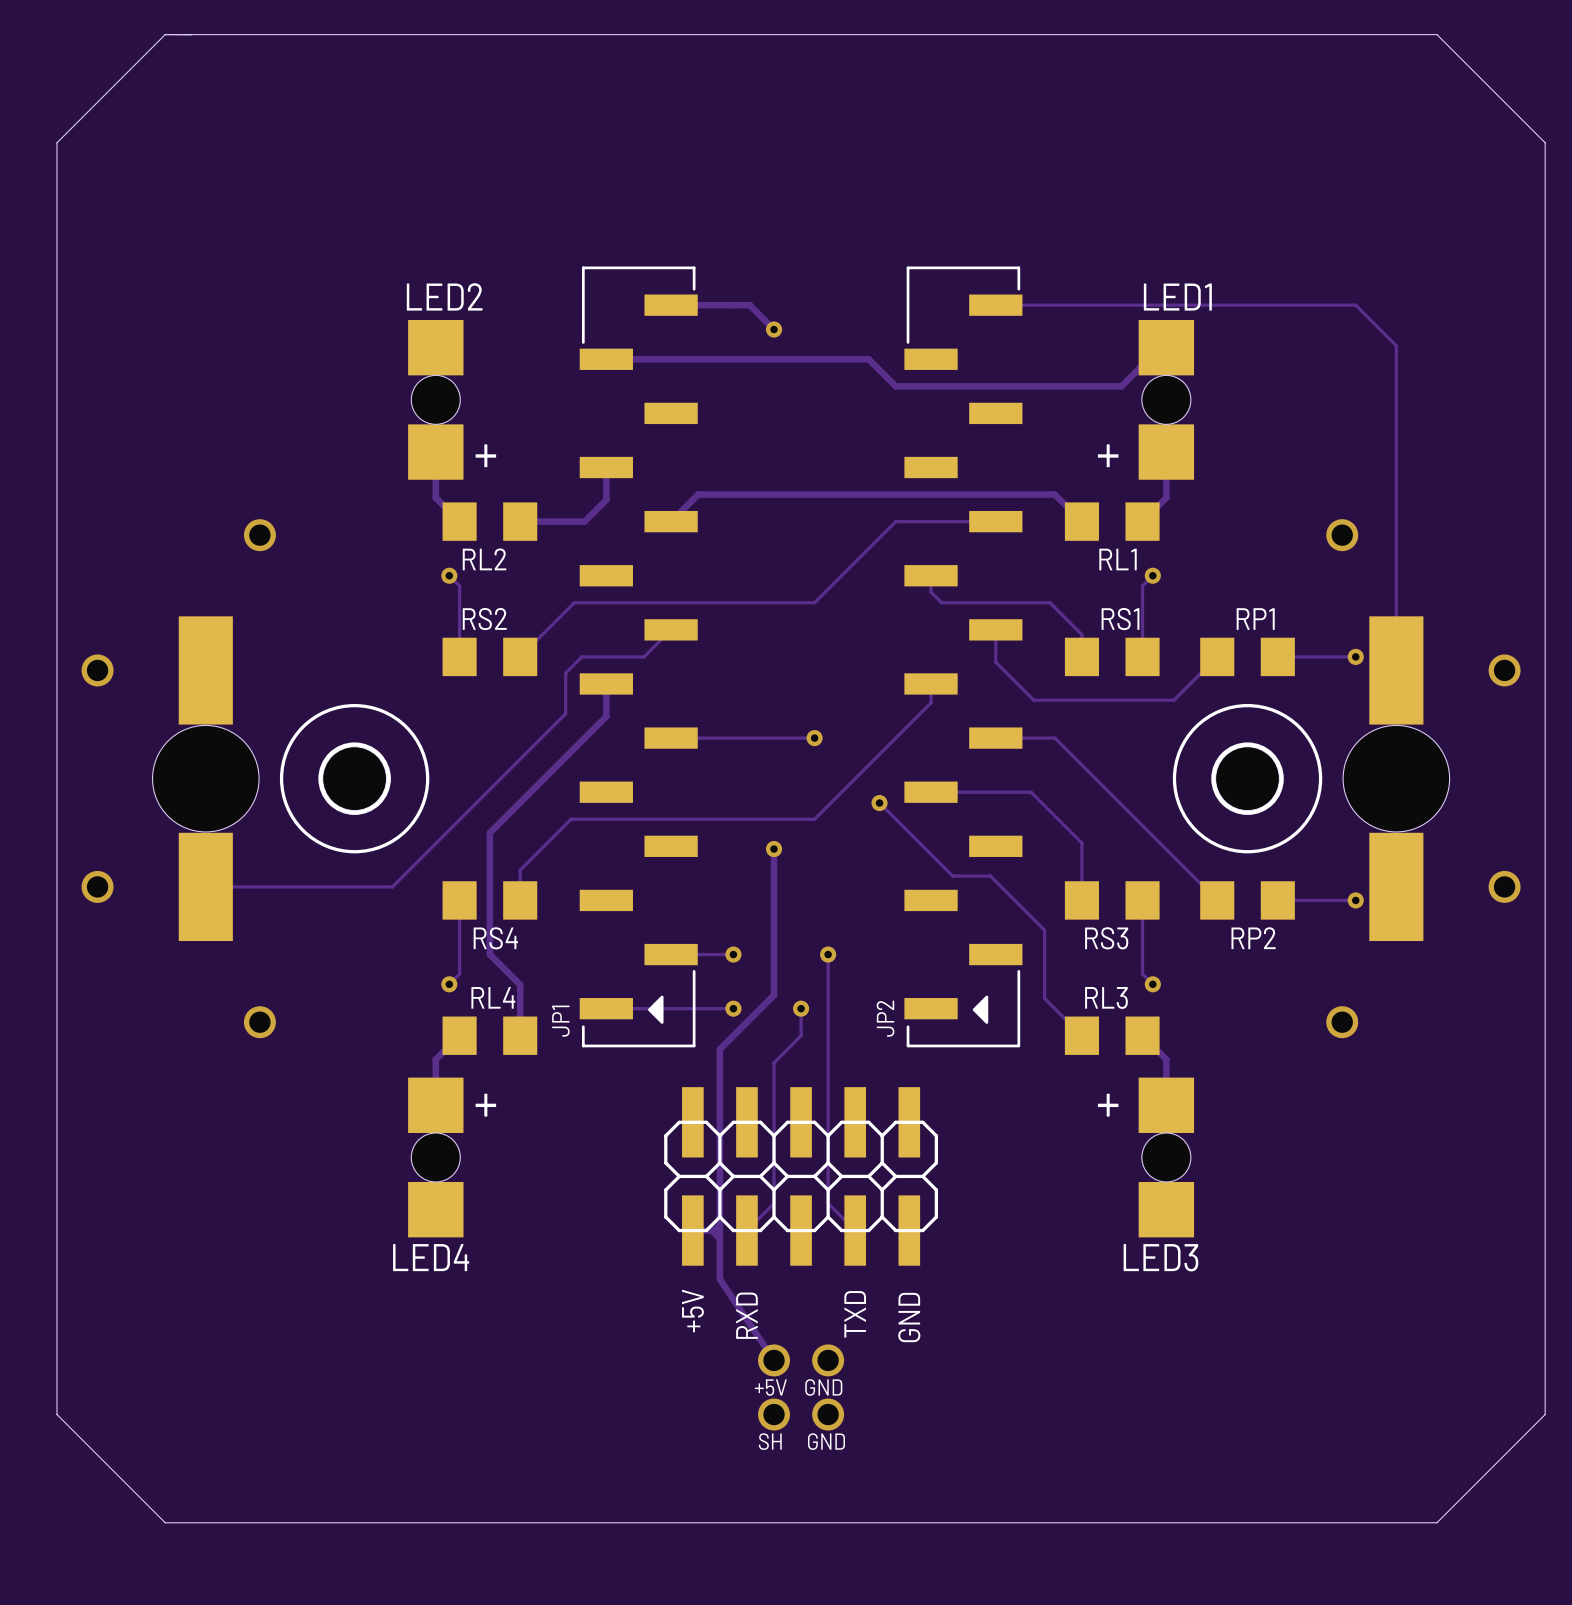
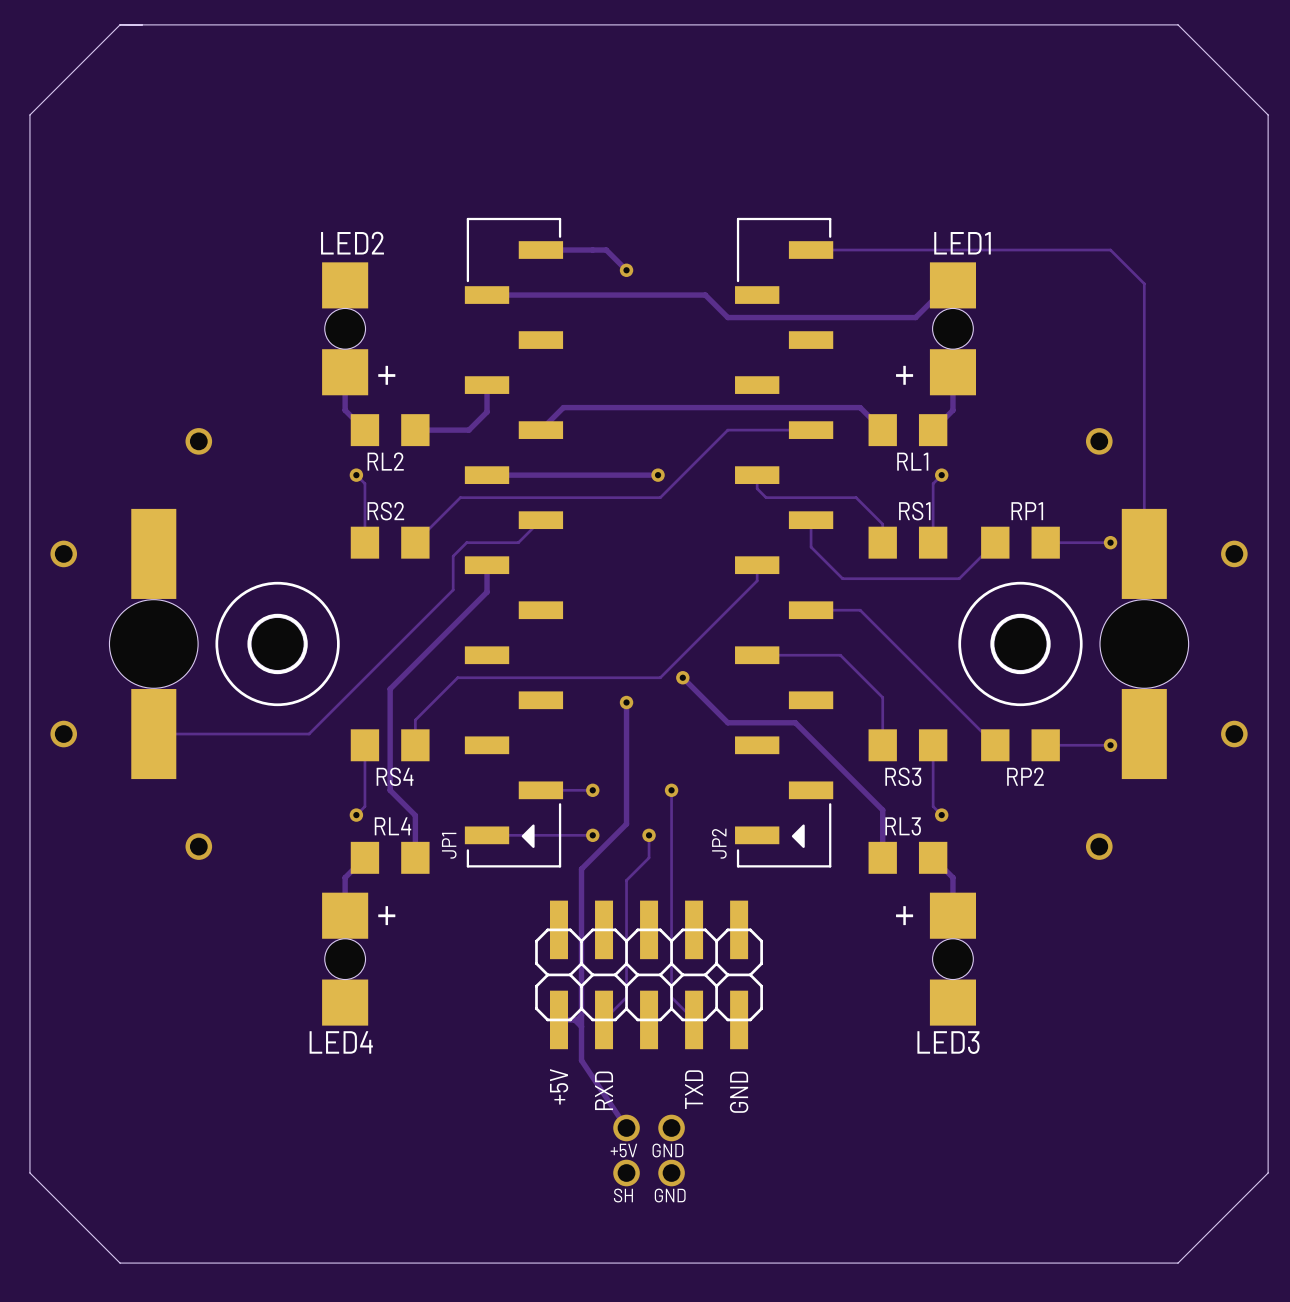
track: none -> (487, 475) (658, 475)
via: none -> (658, 475)
track: (671, 738) (814, 738) -> none
via: (814, 738) -> none
track: (879, 803) (952, 876) (990, 876) (1044, 930) (1044, 998) (1081, 1035) -> (682, 677) (727, 722) (795, 722) (882, 810) (882, 857)
via position: (879, 803) -> (682, 677)

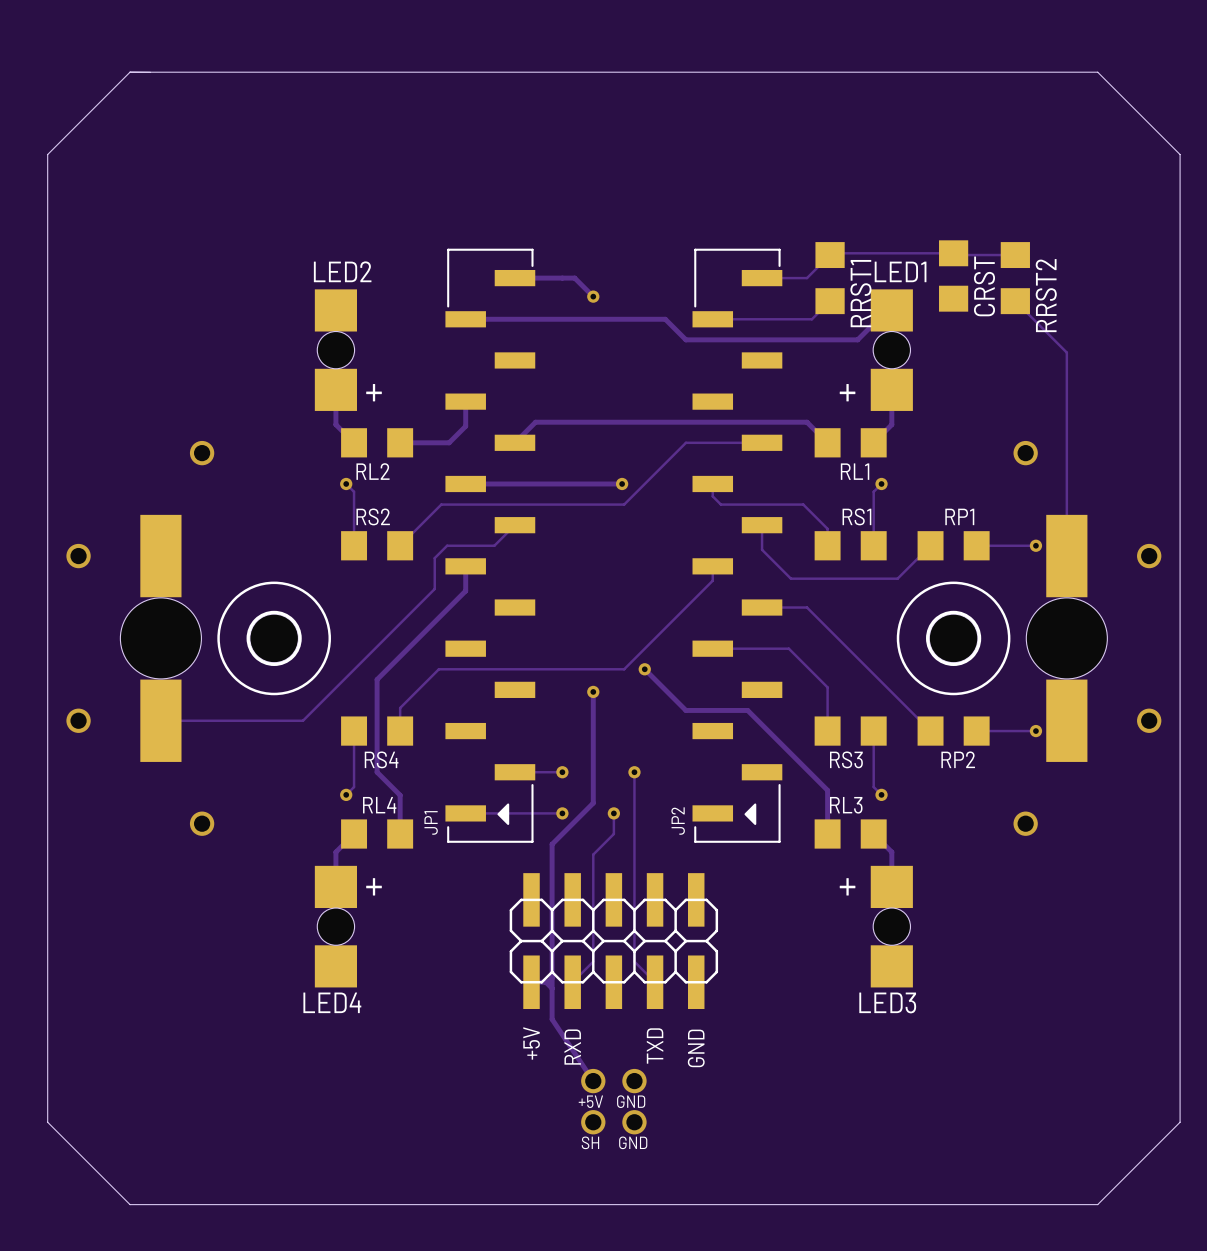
CRST: none -> (953, 275)
track: (860, 250) (1110, 250) (1144, 283) (1144, 331) -> (807, 278) (831, 253) (1015, 255)
RRST1: none -> (830, 278)
RRST2: none -> (1015, 278)
track: none -> (830, 301) (811, 319) (712, 319)
track: none -> (1015, 301) (1066, 352)

